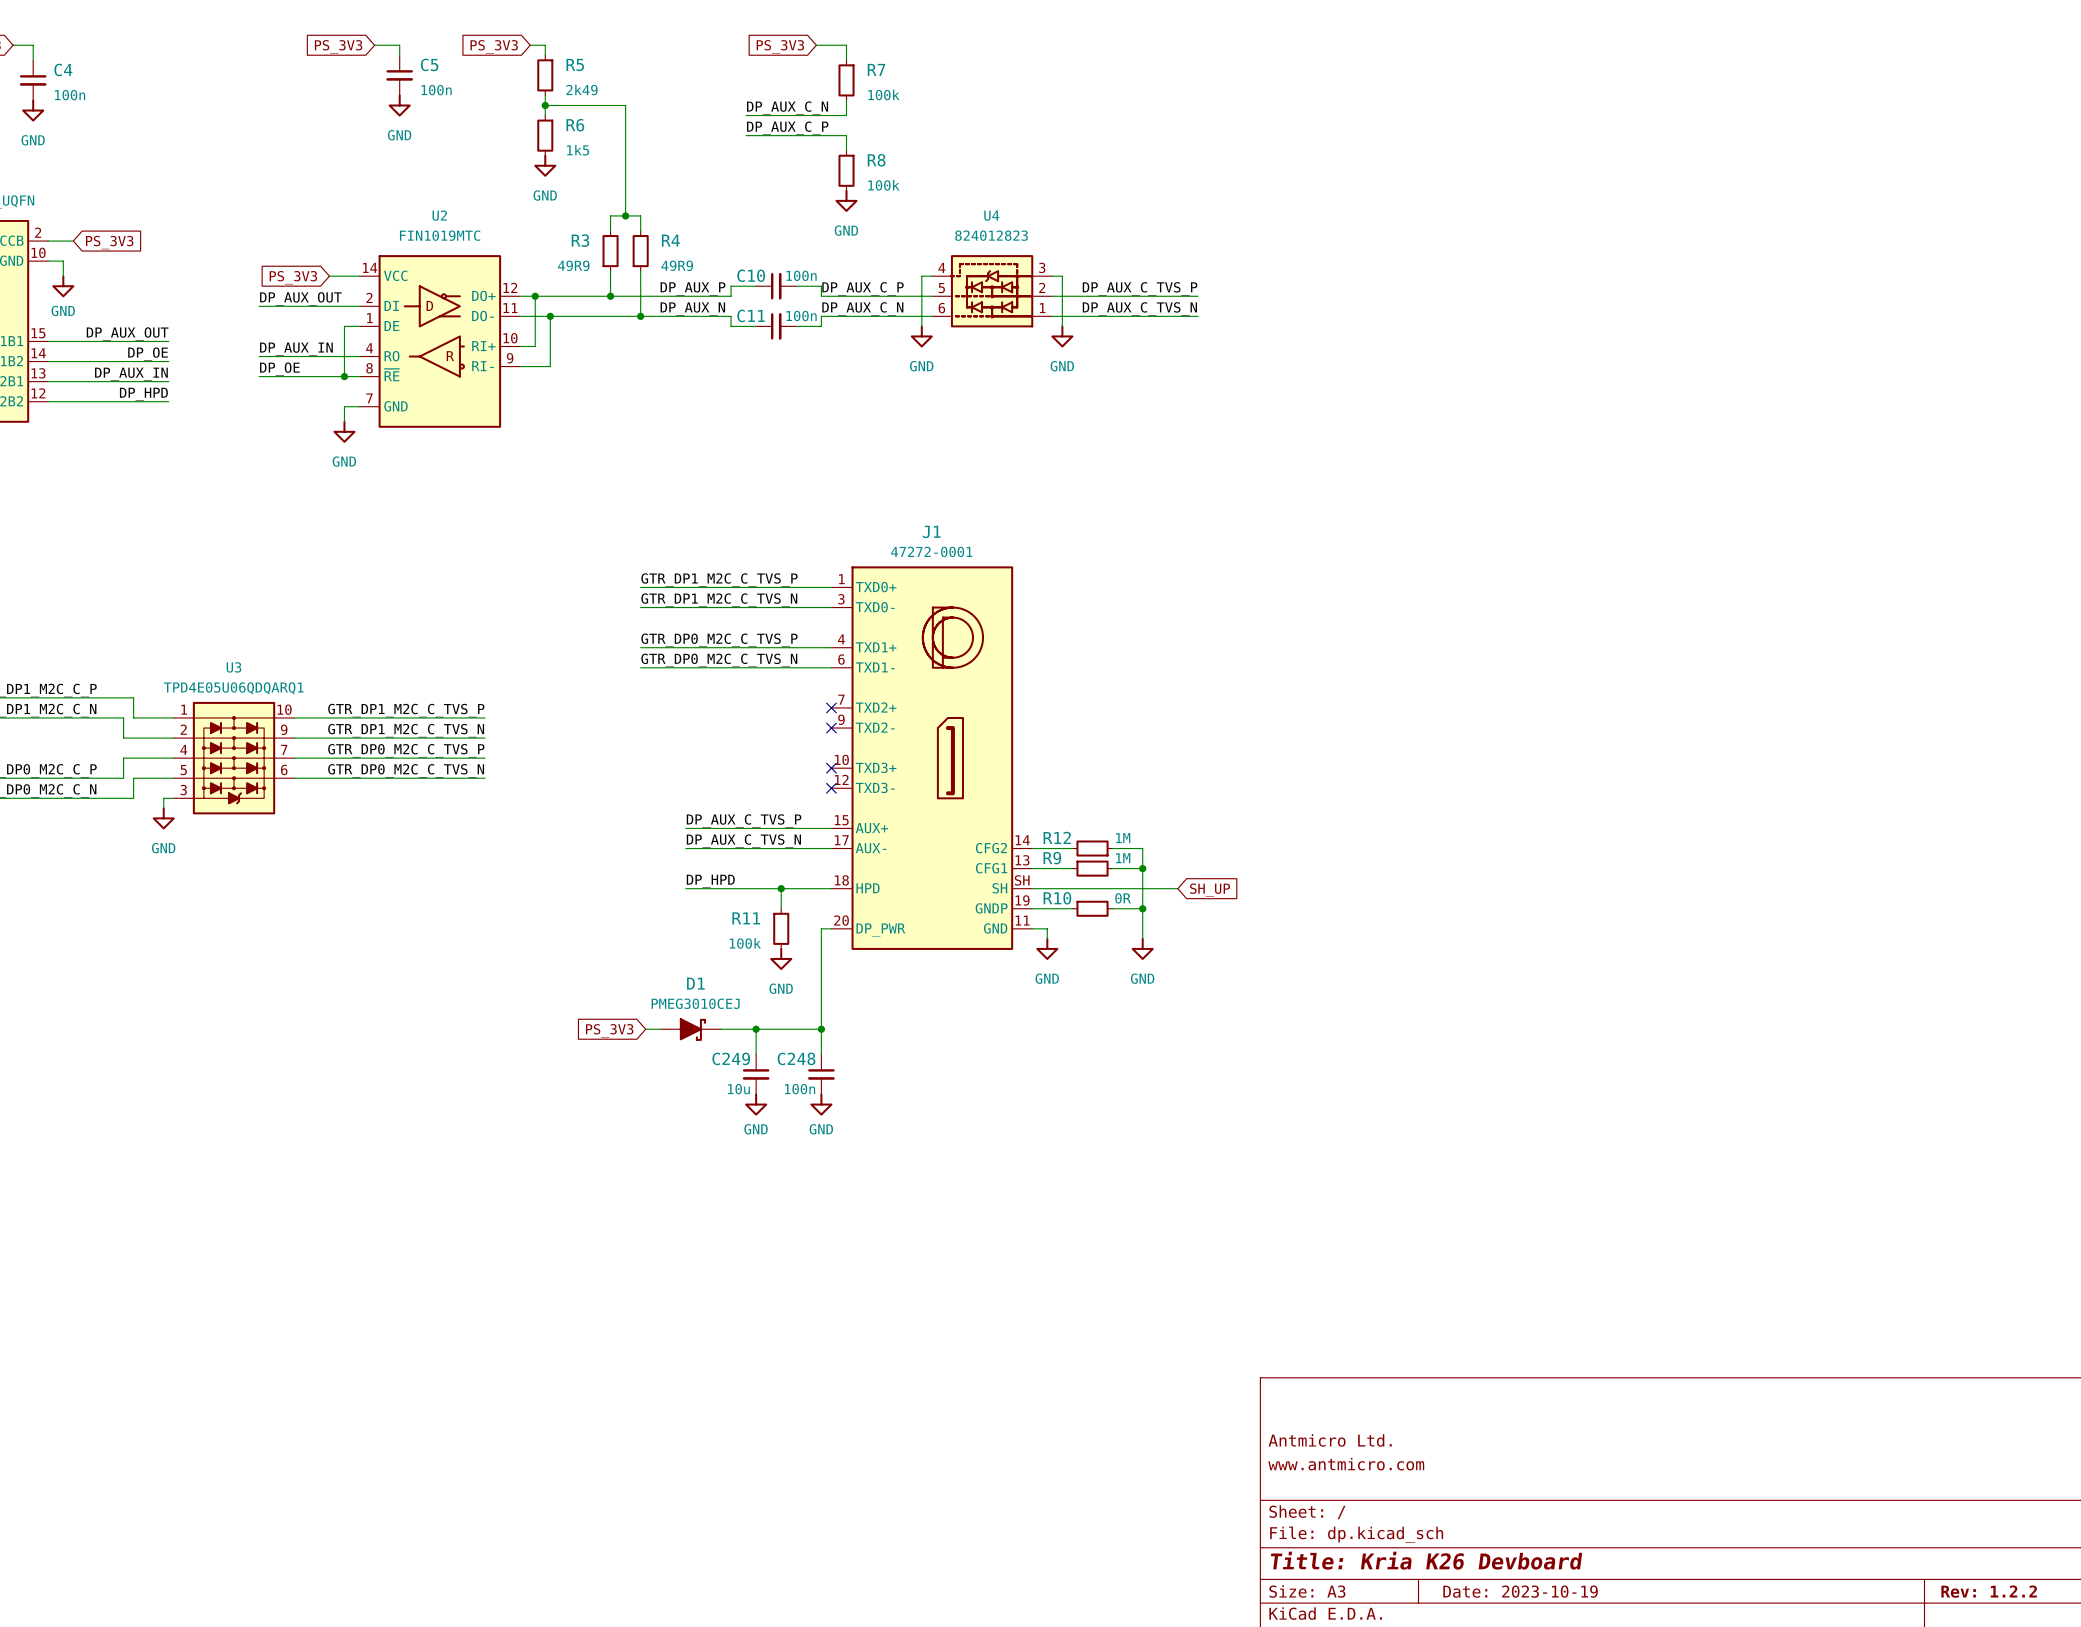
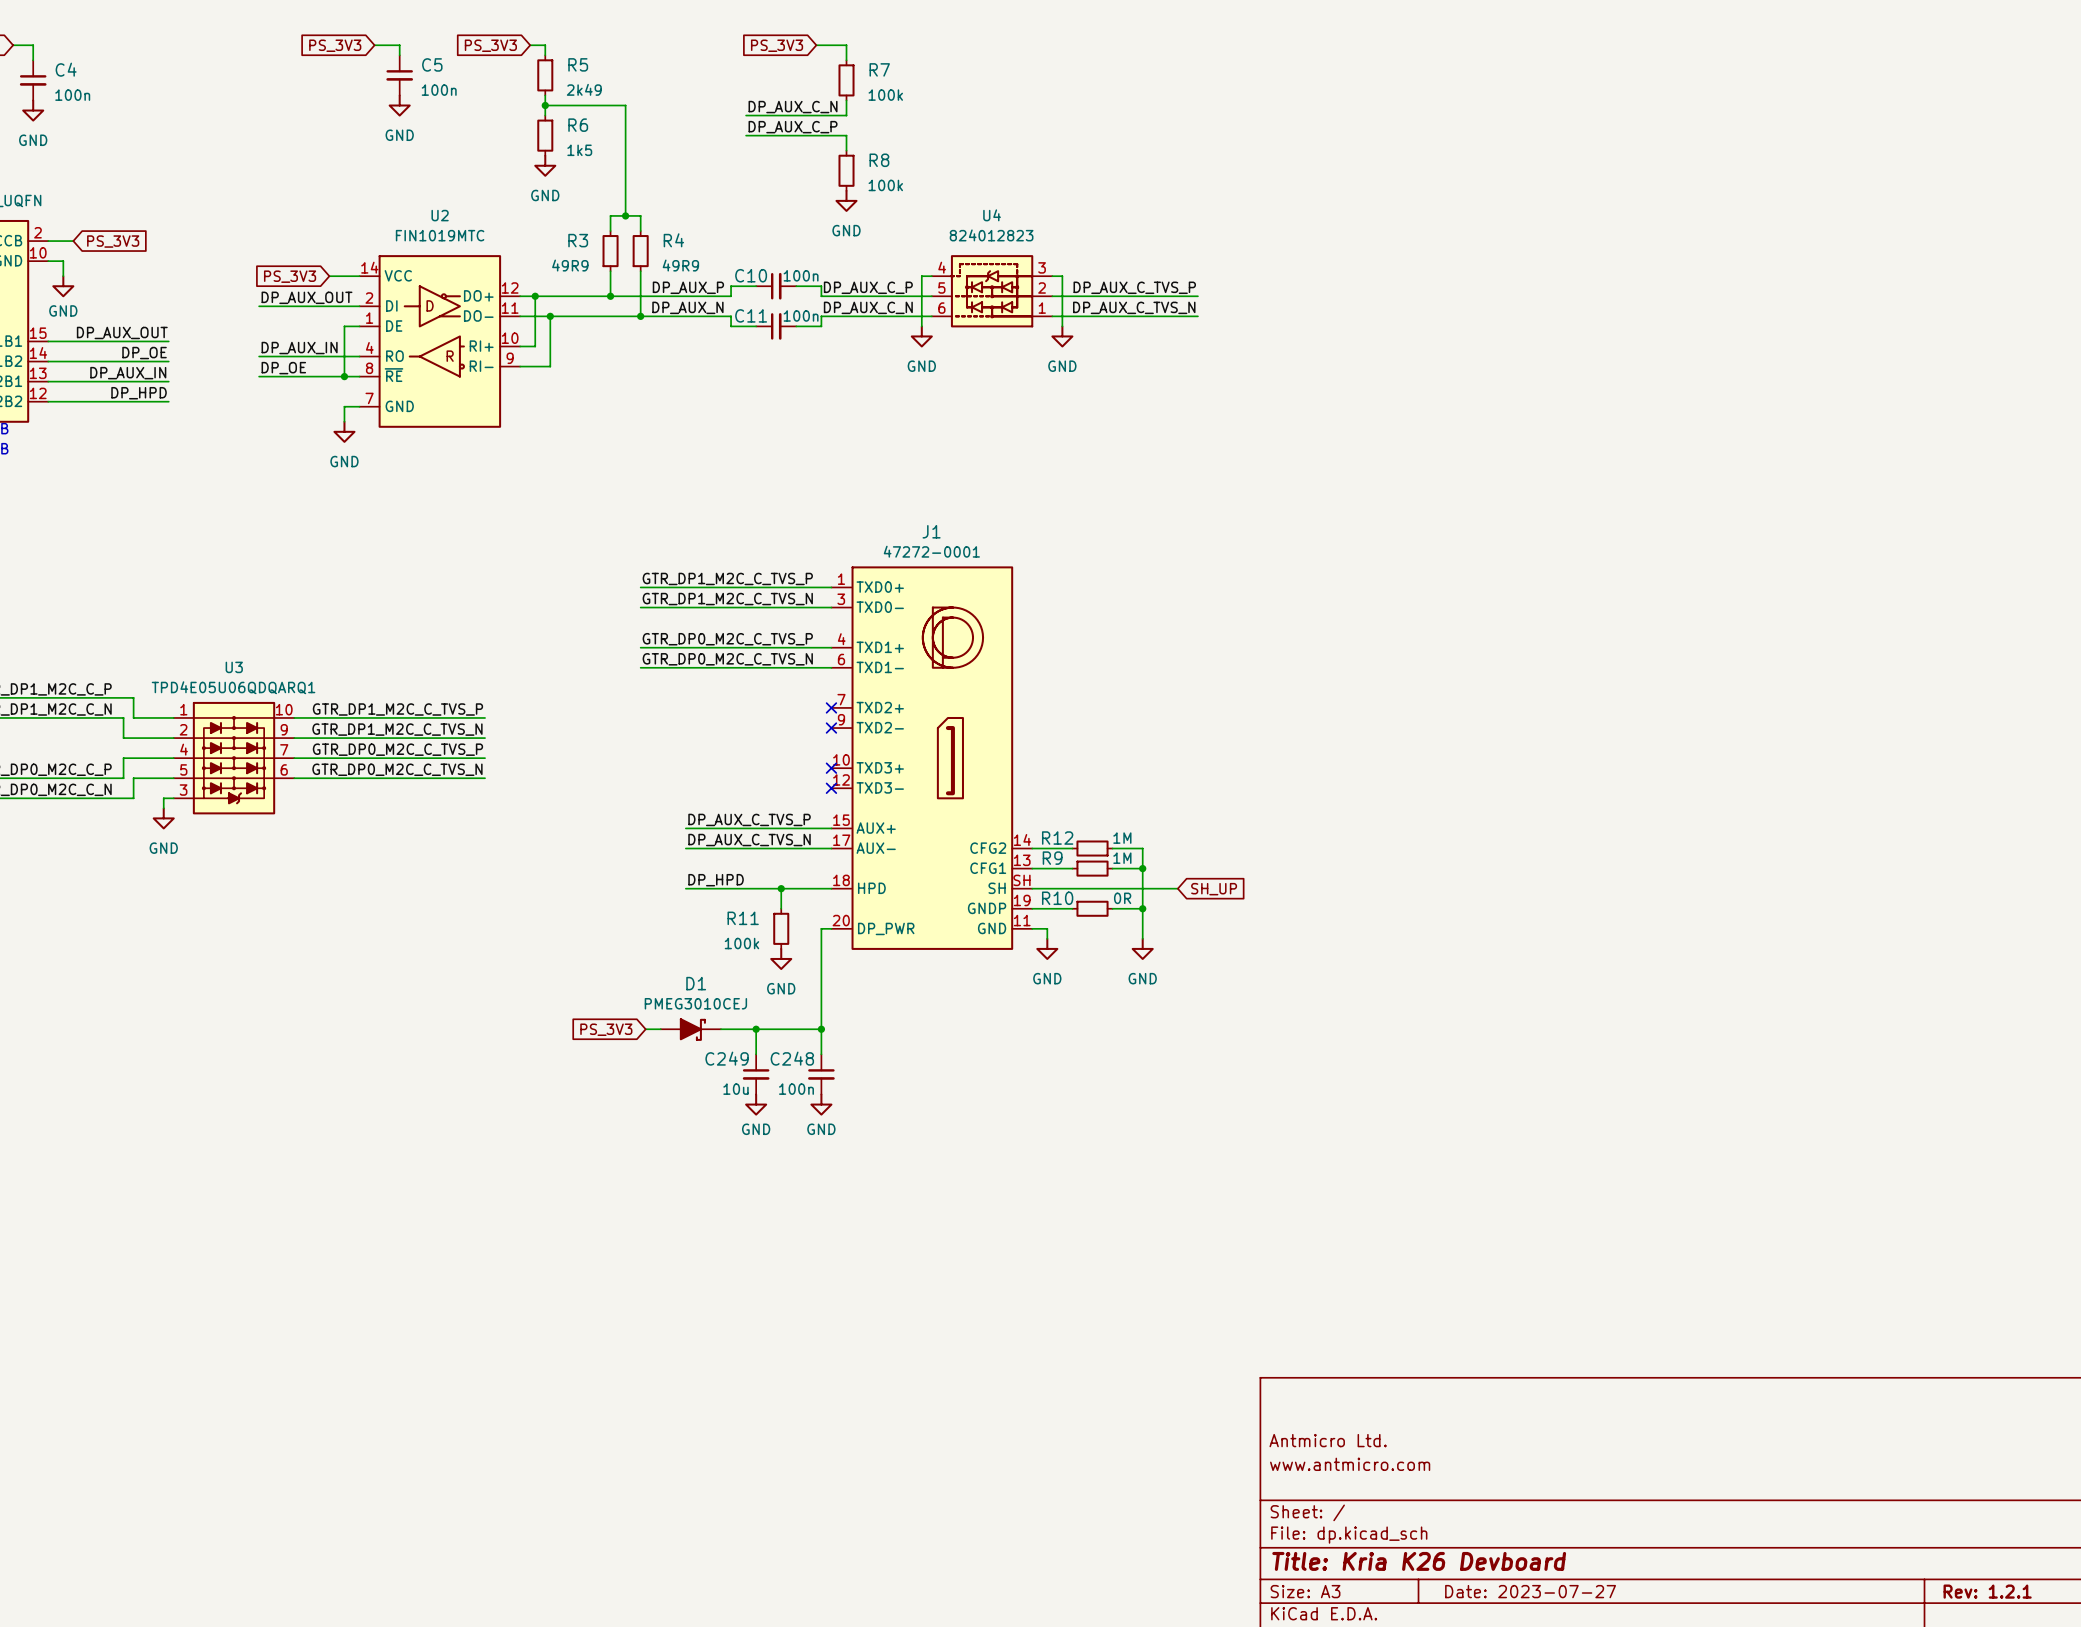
title block: Date: 2023-10-19 (1520, 1591) -> Date: 2023-07-27 (1530, 1591)
title block: Rev: 1.2.2 (1989, 1591) -> Rev: 1.2.1 (1987, 1591)

